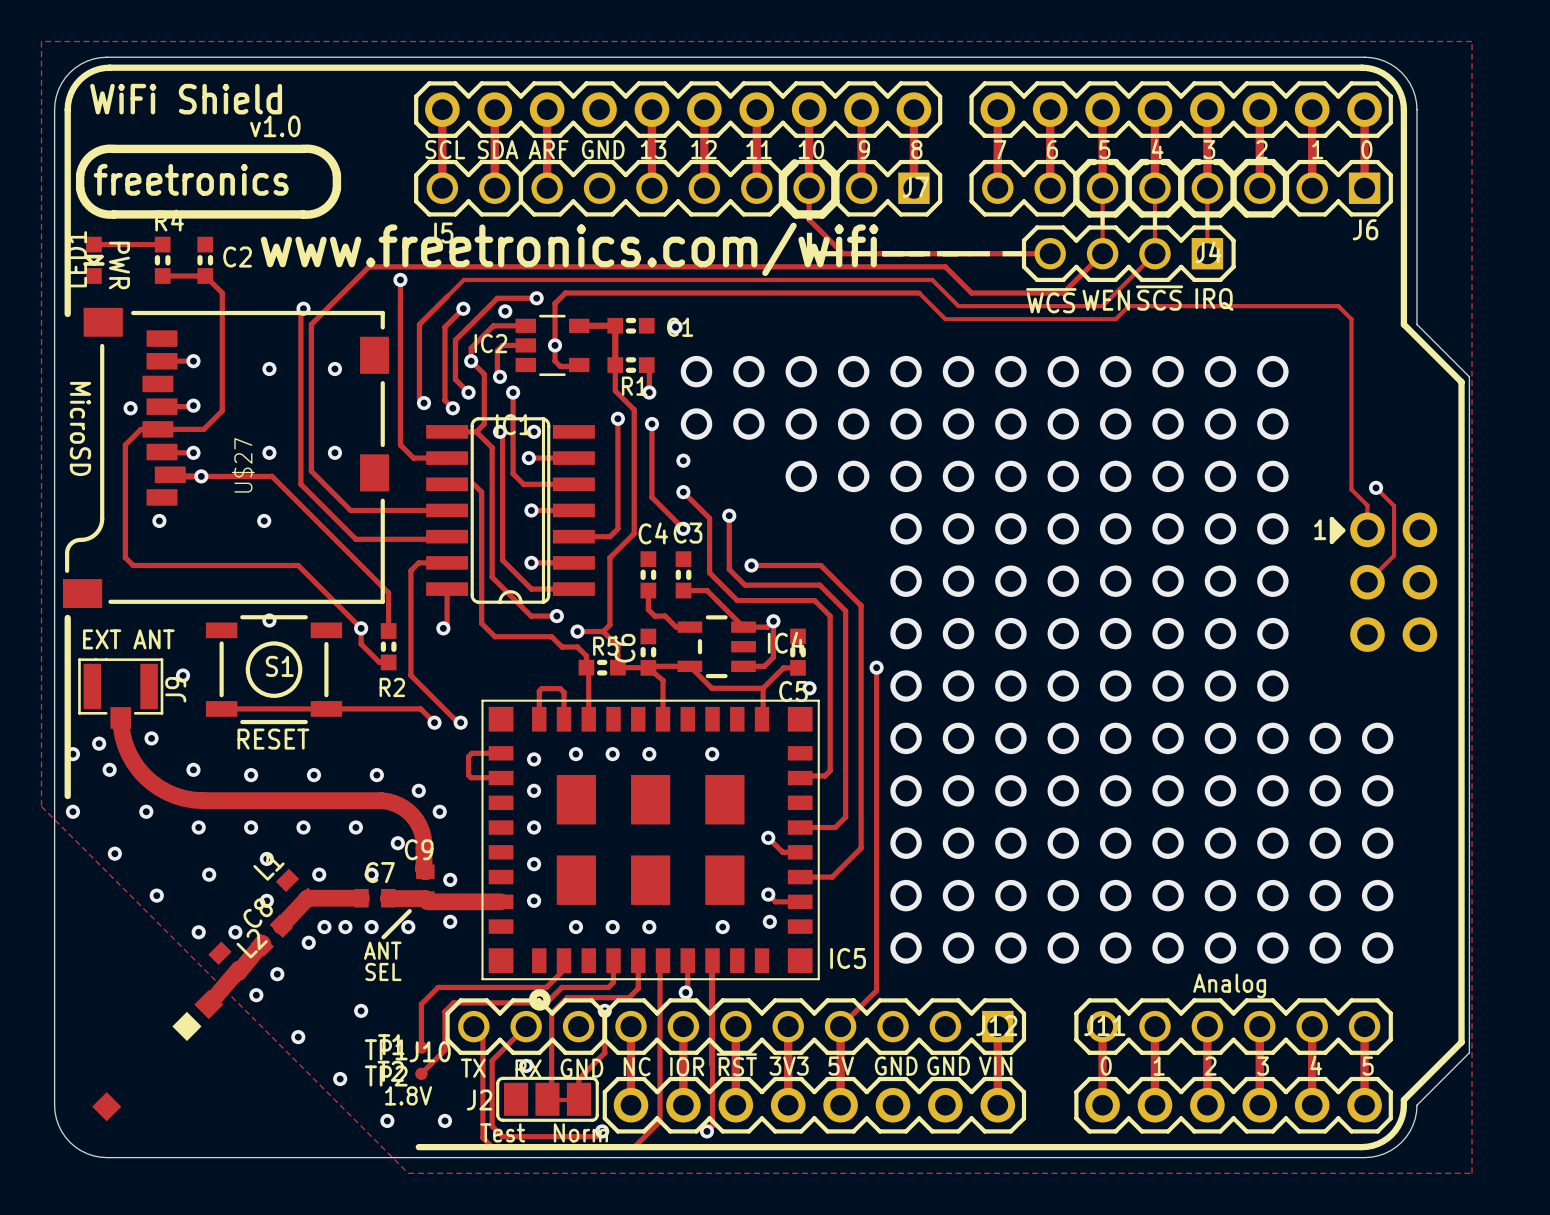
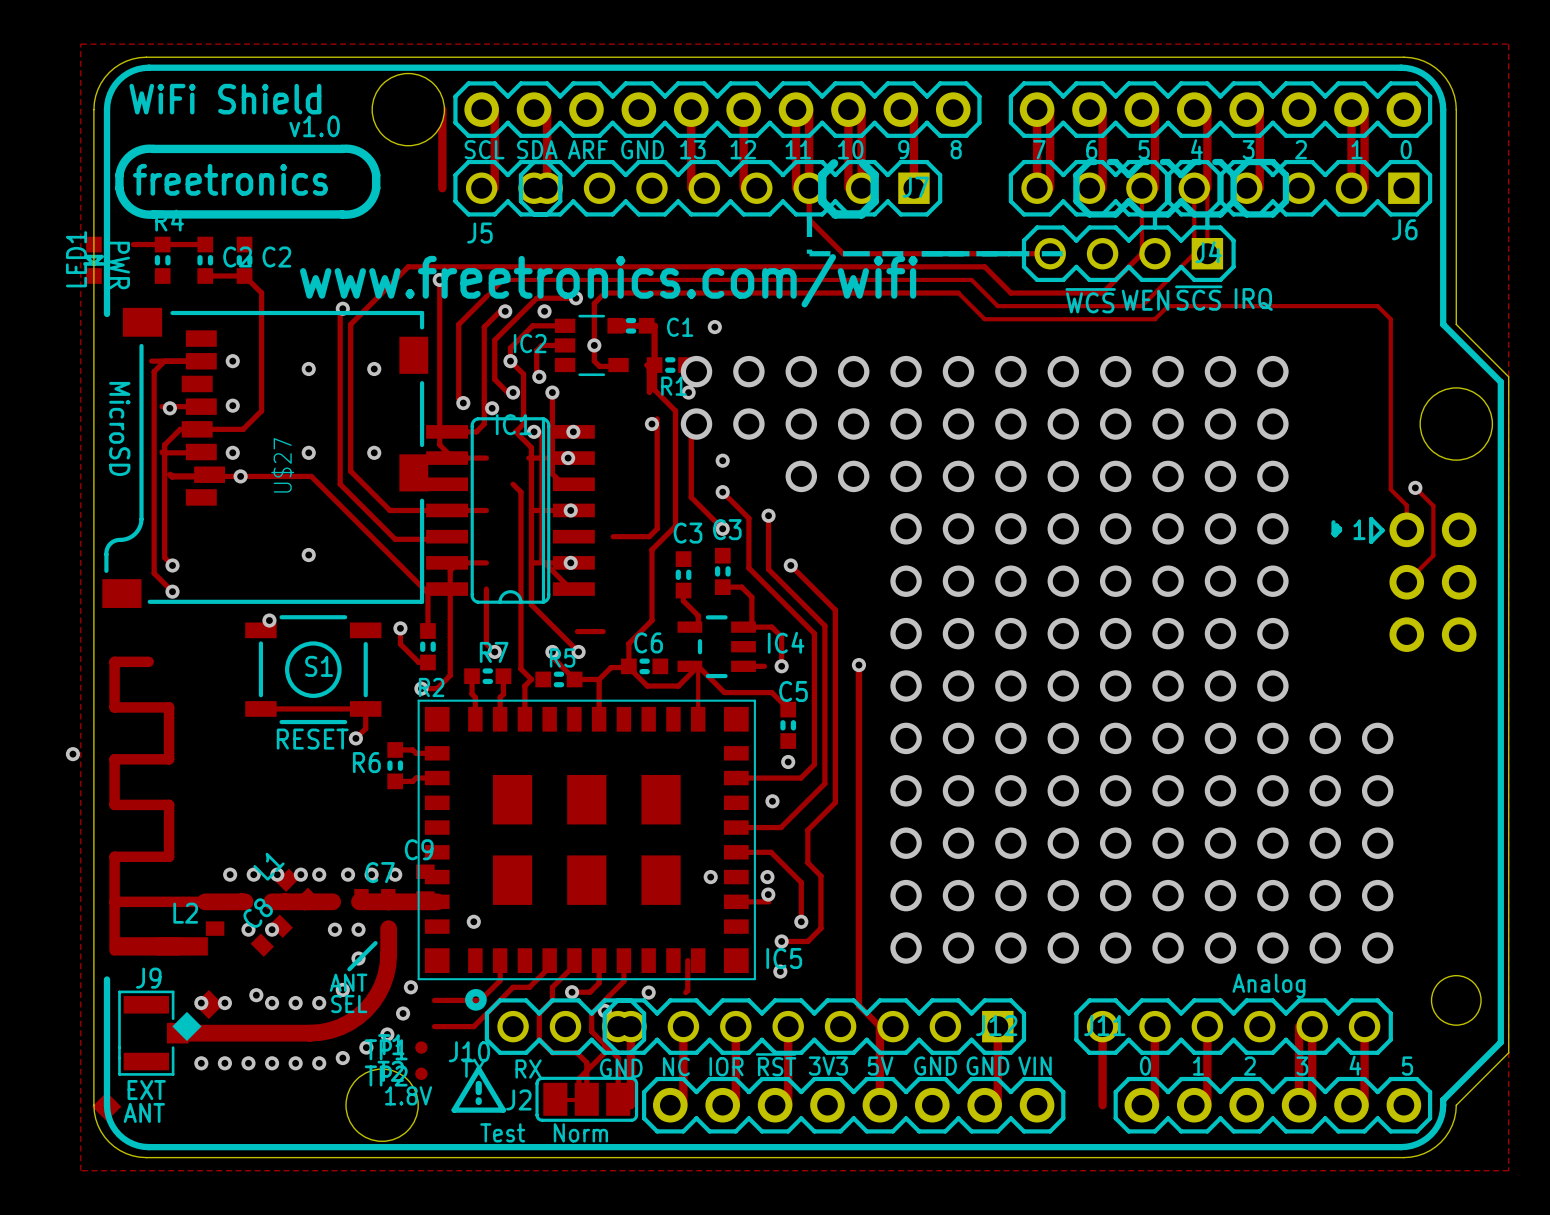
zone outline: (41, 41) (1472, 41) (1472, 1173) (408, 1173) (41, 806) (41, 41) -> (80, 44) (80, 1170) (1508, 1170) (1508, 44) (80, 44)
line: (148, 67) (109, 67) (93, 70) (76, 84) (69, 98) (67, 313) -> (148, 67) (138, 69) (123, 76) (112, 88) (107, 104) (107, 313)
line: (1361, 67) (1372, 69) (1387, 76) (1398, 88) (1403, 104) (1403, 324) (1461, 382) (1461, 1042) (1403, 1099) (1400, 1121) (1391, 1134) (1378, 1143) (1361, 1147) -> (1361, 67) (1412, 69) (1426, 76) (1440, 93) (1443, 109) (1443, 324) (1500, 382) (1500, 1042) (1443, 1099) (1440, 1121) (1426, 1138) (1406, 1146) (1361, 1147)
text position: WiFi Shield (186, 99) -> WiFi Shield (225, 99)
track: (651, 109) (651, 188) -> (691, 109) (691, 188)
track: (704, 109) (704, 188) -> (743, 109) (743, 188)
track: (756, 109) (756, 188) -> (796, 109) (796, 188)
track: none -> (848, 109) (848, 188)
track: (997, 109) (997, 188) -> (1037, 109) (1037, 188)
track: (1312, 109) (1312, 188) -> (1351, 109) (1351, 188)
text position: v1.0 (275, 126) -> v1.0 (314, 126)
line: (153, 148) (110, 148) (98, 151) (86, 160) (80, 175) (82, 195) (88, 205) (95, 210) (110, 214) (153, 214) -> (153, 148) (141, 149) (131, 154) (123, 163) (119, 175) (120, 192) (125, 202) (137, 212) (153, 214)
line: (302, 148) (314, 149) (325, 154) (333, 163) (336, 175) (336, 192) (330, 202) (318, 212) (302, 214) -> (302, 148) (346, 148) (357, 151) (370, 160) (376, 175) (374, 195) (367, 205) (361, 210) (346, 214) (302, 214)
line: (794, 163) (782, 175) (782, 201) (796, 214) (822, 214) (835, 201) (835, 175) (823, 163) -> (834, 163) (822, 175) (822, 201) (835, 214) (861, 214) (874, 201) (874, 175) (862, 163)
line: (1128, 175) (1128, 201) -> (1168, 175) (1168, 201)
line: (1181, 175) (1181, 201) -> (1220, 175) (1220, 201)
text position: freetronics (191, 179) -> freetronics (230, 179)
J5 position: (468, 188) -> (507, 188)
J6 position: (1181, 188) -> (1220, 188)
track: (1102, 191) (1102, 253) (1063, 293) -> (1141, 191) (1141, 253) (1102, 293) (1063, 293)
track: (1154, 191) (1154, 253) (1102, 306) -> (1194, 191) (1194, 253) (1141, 306)
line: (1102, 214) (1102, 224) -> none
track: (93, 244) (133, 244) -> none
text position: www.freetronics.com/wifi (569, 249) -> www.freetronics.com/wifi (608, 280)
line: none -> (1023, 253) (1063, 253)
C2: none -> (244, 260)
track: (408, 266) (369, 266) (311, 324) (311, 471) (350, 510) (389, 510) -> (408, 266) (350, 324) (350, 471) (389, 510)
track: (945, 266) (971, 293) (1010, 293) -> (945, 266) (984, 266) (1010, 293)
track: (162, 275) (201, 275) -> (162, 244) (201, 244)
track: (205, 275) (222, 293) (222, 410) (203, 429) -> (205, 275) (244, 275) (261, 293) (261, 410) (243, 429) (203, 429)
track: (400, 279) (400, 444) (413, 458) (447, 458) -> (439, 279) (439, 444) (452, 458) (486, 458)
via: (400, 279) -> none
via: none -> (439, 279)
track: (503, 279) (463, 279) (419, 324) (419, 398) (424, 403) -> (503, 279) (458, 324) (458, 398) (463, 403)
track: (932, 279) (958, 306) (997, 306) -> (932, 279) (971, 279) (997, 306)
track: (604, 293) (565, 293) (555, 303) (555, 361) (560, 366) (579, 365) -> (604, 293) (594, 303) (594, 361) (599, 366) (618, 365)
track: (919, 293) (945, 319) (984, 319) -> (919, 293) (958, 293) (984, 319)
track: (536, 298) (497, 298) (455, 340) (455, 379) (468, 392) -> (575, 298) (536, 298) (494, 340) (494, 379) (507, 392)
via position: (536, 298) -> (544, 311)
via: none -> (575, 298)
text position: ~{SCS} (1159, 298) -> ~{SCS} (1198, 298)
text position: IRQ (1214, 299) -> IRQ (1253, 299)
text position: ~{WCS} (1051, 300) -> ~{WCS} (1090, 300)
text position: WEN (1106, 300) -> WEN (1145, 300)
track: (1128, 306) (1115, 319) -> (1128, 306) (1102, 306)
track: (1141, 306) (1168, 306) -> (1115, 319) (1154, 319) (1168, 306)
track: (1338, 306) (1351, 319) (1351, 489) (1367, 505) (1367, 529) -> (1338, 306) (1377, 306) (1390, 319) (1390, 489) (1406, 505) (1406, 529)
track: (303, 308) (300, 311) (300, 484) (355, 539) (395, 539) -> (342, 308) (340, 311) (340, 484) (395, 539)
via: (303, 308) -> none
via: none -> (342, 308)
track: (463, 308) (444, 327) (444, 400) (452, 408) -> none
via: (463, 308) -> none
track: (525, 325) (493, 325) (471, 348) (471, 361) (484, 374) -> (502, 308) (484, 327) (484, 374)
track: none -> (565, 325) (532, 325) (510, 348) (510, 361) (523, 374) (523, 424) (515, 431) (531, 447) (531, 604) (578, 651)
track: (579, 325) (615, 325) (615, 390) (634, 409) (634, 533) (609, 557) (609, 624) (603, 631) (617, 646) (617, 667) (648, 667) -> none
track: none -> (618, 325) (654, 325) (654, 389) (675, 410) (675, 526) (651, 549) (651, 620) (628, 643) (628, 667)
via: (675, 327) -> none
via: none -> (714, 327)
track: (525, 345) (502, 345) (497, 350) (497, 374) (500, 376) -> (565, 345) (541, 345) (536, 350) (536, 374) (539, 376)
IC2 position: (552, 345) -> (591, 345)
via: (555, 345) -> none
via: none -> (594, 345)
via: (193, 361) -> none
track: none -> (201, 361) (164, 361) (154, 371) (154, 573) (172, 591)
via: none -> (232, 361)
via: (471, 361) -> none
via: none -> (510, 361)
R1 position: (631, 365) -> (670, 365)
via: (269, 369) -> none
via: none -> (308, 369)
via: (334, 369) -> none
via: none -> (374, 369)
via: (500, 376) -> none
via: none -> (539, 376)
via: (468, 392) -> none
track: (513, 392) (513, 473) (523, 484) (562, 484) -> (552, 392) (552, 473) (562, 484)
via: none -> (552, 392)
via: (649, 392) -> none
via: none -> (688, 392)
via: (424, 403) -> none
via: none -> (463, 403)
via: (193, 405) -> none
via: none -> (232, 405)
via: (130, 408) -> none
via: none -> (169, 408)
via: (452, 408) -> none
via: none -> (492, 408)
track: (617, 418) (617, 528) (610, 536) (573, 536) -> (657, 418) (657, 528) (649, 536) (613, 536)
via: (617, 418) -> none
track: (651, 424) (651, 497) (683, 528) -> (691, 424) (691, 497) (722, 528)
text position: MicroSD (80, 428) -> MicroSD (119, 428)
track: (180, 429) (140, 429) (125, 444) (125, 557) (133, 565) (298, 565) (361, 628) (361, 644) (379, 662) (388, 662) -> (180, 429) (164, 444) (164, 557) (172, 565)
track: (476, 431) (492, 447) (492, 577) (531, 616) (556, 616) -> none
track: (500, 431) (502, 434) (502, 560) (531, 589) (570, 589) -> (539, 431) (541, 434) (541, 560) (570, 589)
via: (500, 431) -> none
via: none -> (573, 431)
via: (193, 452) -> none
via: none -> (232, 452)
via: (269, 452) -> none
via: none -> (308, 452)
via: (334, 452) -> none
via: none -> (374, 452)
U$27 position: (225, 457) -> (265, 457)
via: (528, 458) -> none
via: none -> (568, 458)
via: (683, 460) -> none
via: none -> (722, 460)
via: (201, 476) -> none
via: none -> (240, 476)
track: (272, 476) (388, 593) (388, 631) -> (272, 476) (311, 476) (427, 593) (427, 631)
track: (473, 484) (481, 492) (481, 623) (494, 636) (551, 636) (561, 647) (577, 647) (586, 656) (586, 667) (588, 669) (588, 719) (592, 715) -> none
track: none -> (513, 484) (520, 492) (520, 668) (531, 679) (524, 686) (524, 719)
track: (1376, 487) (1394, 505) (1394, 555) (1367, 582) -> (1415, 487) (1433, 505) (1433, 555) (1406, 582)
via position: (1376, 487) -> (1415, 487)
track: (683, 492) (709, 518) (709, 572) (737, 600) (814, 600) (830, 616) (830, 770) (825, 775) (802, 775) (800, 778) -> none
via: (683, 492) -> none
track: none -> (722, 492) (748, 518) (748, 568) (814, 633) (814, 764) (800, 778) (736, 778)
via: none -> (722, 492)
via: (531, 510) -> none
via: none -> (570, 510)
track: (729, 515) (729, 569) (744, 585) (819, 585) (845, 610) (845, 817) (835, 827) (800, 827) -> none
via position: (729, 515) -> (722, 528)
track: none -> (768, 515) (768, 569) (824, 625) (824, 783) (780, 827) (736, 827)
via: none -> (768, 515)
line: (1331, 518) (1343, 530) (1331, 541) (1331, 518) -> (1371, 518) (1382, 530) (1371, 541) (1371, 518)
via: (159, 520) -> none
via: (264, 520) -> none
via: (683, 528) -> none
text position: 1 (1320, 529) -> 1 (1359, 529)
via: none -> (308, 555)
track: (447, 562) (418, 562) (410, 570) (410, 675) (458, 722) (460, 722) -> none
track: none -> (486, 562) (458, 562) (450, 570) (450, 675) (437, 688) (421, 688)
via: (531, 562) -> none
via: none -> (570, 562)
via: none -> (172, 565)
track: (751, 565) (820, 565) (861, 605) (861, 848) (832, 877) (800, 877) -> none
via: (751, 565) -> none
track: none -> (790, 565) (835, 610) (835, 802) (807, 830) (807, 862) (820, 875) (820, 928) (807, 941) (781, 941)
via: none -> (790, 565)
C3: none -> (722, 571)
C4: (648, 574) -> none
track: none -> (683, 587) (683, 600) (698, 615) (698, 627)
track: (447, 589) (447, 624) (443, 628) -> none
track: none -> (486, 589) (486, 643) (494, 651)
track: (648, 590) (648, 609) (654, 616) (665, 616) (676, 627) (689, 627) -> none
track: (683, 590) (706, 590) (743, 627) (751, 627) -> (722, 587) (741, 587) (751, 597) (751, 627)
via: none -> (172, 591)
part: (762, 607) -> none
part: none -> (801, 607)
via: (556, 616) -> none
line: (67, 617) (67, 796) -> none
via: (773, 621) -> none
track: (767, 627) (773, 621) (773, 657) (764, 666) -> (767, 627) (771, 627) (781, 636) (781, 666)
via: (361, 628) -> none
track: none -> (400, 628) (400, 644) (418, 662) (427, 662)
via: none -> (400, 628)
via: (443, 628) -> none
via: (577, 631) -> none
text: EXT ANT (128, 639) -> none
R2 position: (388, 646) -> (427, 646)
via: none -> (494, 651)
track: none -> (552, 651) (552, 657) (574, 679) (599, 679)
via: none -> (552, 651)
via: none -> (578, 651)
C6 rotation: 0° (648, 652) -> 90° clockwise (644, 666)
C5 position: (798, 652) -> (788, 725)
track: none -> (858, 665) (858, 1005) (879, 1026) (879, 1105)
track: none -> (698, 666) (698, 719)
via: none -> (781, 666)
R5 position: (602, 667) -> (558, 679)
track: none -> (628, 667) (647, 686) (678, 686) (698, 666) (724, 692) (771, 692) (788, 709)
track: none -> (628, 667) (611, 667) (599, 679)
track: (648, 667) (648, 666) (689, 666) (711, 688) (763, 688) -> none
track: (648, 667) (663, 680) (663, 719) -> none
track: (798, 667) (783, 667) (763, 688) -> none
track: (876, 667) (876, 990) (840, 1026) (840, 1105) -> none
via position: (876, 667) -> (858, 665)
S1 position: (274, 669) -> (313, 669)
via: (182, 675) -> none
track: none -> (472, 676) (472, 694) (475, 697) (475, 719)
R7: none -> (487, 676)
track: none -> (503, 676) (503, 694) (500, 697) (500, 719)
track: none -> (599, 679) (599, 719)
via: none -> (421, 688)
track: (763, 688) (762, 719) -> none
via: (809, 688) -> none
J9 rotation: 0° (120, 693) -> 90° counterclockwise (153, 1033)
J9 position: (120, 693) -> (153, 1033)
track: (221, 708) (260, 708) -> (447, 510) (486, 510)
track: (365, 708) (420, 708) (434, 722) -> (365, 708) (365, 728) (355, 738)
track: (120, 717) (122, 736) (133, 761) (144, 776) (167, 792) (185, 798) (203, 800) (381, 800) (393, 802) (408, 811) (419, 825) (423, 842) (425, 871) (424, 866) -> none
track: (539, 719) (539, 691) (541, 688) (560, 688) (563, 692) (563, 719) -> none
via: (434, 722) -> none
via: (460, 722) -> none
via: (151, 738) -> none
via: none -> (355, 738)
text position: RESET (273, 739) -> RESET (312, 739)
via: (99, 743) -> none
track: none -> (395, 749) (412, 749) (416, 753) (437, 753)
track: (501, 753) (472, 753) (468, 756) (468, 775) (471, 777) (501, 778) -> none
via: (575, 754) -> none
via: (612, 754) -> none
via: (649, 754) -> none
via: (712, 754) -> none
via: (534, 759) -> none
via: none -> (788, 762)
R6: none -> (395, 765)
via: (109, 769) -> none
via: (193, 769) -> none
via: (251, 775) -> none
via: (313, 775) -> none
via: (376, 775) -> none
track: none -> (437, 778) (416, 778) (412, 781) (395, 781)
via: (418, 790) -> none
via: (534, 790) -> none
via: none -> (772, 801)
part: none -> (159, 806)
via: (72, 811) -> none
via: (146, 811) -> none
via: (439, 811) -> none
via: (198, 827) -> none
via: (251, 827) -> none
via: (303, 827) -> none
via: (355, 827) -> none
via: (534, 827) -> none
track: (768, 837) (782, 852) (800, 852) -> none
via: (768, 837) -> none
via: (397, 843) -> none
track: none -> (736, 852) (771, 852) (801, 882) (801, 921)
via: (114, 853) -> none
IC5 position: (650, 855) -> (586, 855)
via: (266, 858) -> none
via: (534, 864) -> none
via: (209, 874) -> none
via: none -> (230, 874)
via: none -> (253, 874)
via: none -> (277, 874)
via: none -> (300, 874)
via: none -> (348, 874)
via: none -> (395, 874)
via: none -> (710, 877)
via: none -> (767, 877)
via: (450, 879) -> none
track: (768, 894) (775, 901) (800, 901) -> none
via: (156, 895) -> none
track: (361, 898) (307, 898) (281, 926) -> none
track: (388, 898) (425, 898) (428, 901) -> (359, 901) (428, 901)
via: (266, 900) -> none
via: (534, 900) -> none
track: none -> (205, 901) (245, 901)
track: none -> (271, 901) (332, 901)
track: (437, 901) (501, 901) -> none
track: none -> (736, 901) (768, 901)
line: (409, 911) (383, 937) -> (375, 943) (349, 969)
via position: (450, 921) -> (473, 921)
via: (769, 921) -> none
via: none -> (801, 921)
via: (324, 927) -> none
via: (345, 927) -> none
via: (371, 927) -> none
via: (408, 927) -> none
via: (575, 927) -> none
via: (612, 927) -> none
via: (649, 927) -> none
via: (722, 927) -> none
track: none -> (388, 928) (387, 964) (382, 984) (372, 1002) (349, 1022) (330, 1030) (310, 1033) (177, 1033)
via: none -> (272, 929)
via: none -> (334, 929)
via: none -> (358, 929)
via: (198, 932) -> none
via position: (235, 932) -> (248, 929)
via: none -> (781, 941)
via: (308, 942) -> none
L2 name position: L2 (252, 943) -> L2 (185, 913)
track: (262, 945) (262, 943) (208, 1004) -> none
text position: ANT (382, 950) -> ANT (348, 982)
via: none -> (358, 958)
track: none -> (500, 960) (500, 980) (480, 1000) (434, 1000)
track: none -> (549, 960) (549, 967) (529, 987) (513, 987) (473, 1026) (434, 1026)
track: (563, 960) (563, 969) (546, 987) (438, 987) (421, 1004) (421, 1047) -> none
track: none -> (574, 960) (574, 965) (552, 987) (552, 1000) (539, 1013) (539, 1039) (552, 1052) (576, 1052) (586, 1062) (586, 1099)
track: none -> (599, 960) (599, 983) (590, 992) (572, 992)
track: (613, 960) (613, 982) (608, 987) (561, 987) (546, 1002) (453, 1002) (444, 1011) (444, 1050) (421, 1073) -> none
track: none -> (623, 960) (623, 981) (591, 1013) (591, 1031) (618, 1058) (618, 1099)
track: (638, 960) (638, 988) (629, 997) (567, 997) (551, 1013) (551, 1095) (547, 1099) -> none
track: (663, 960) (659, 963) (659, 1121) (634, 1147) (492, 1147) (482, 1137) (482, 1035) (473, 1026) -> none
L2 rotation: 0° (229, 962) -> 45° clockwise (215, 915)
L2 position: (229, 962) -> (215, 915)
via: none -> (780, 971)
text position: SEL (383, 972) -> SEL (349, 1004)
via: (277, 974) -> none
line: none -> (107, 979) (107, 1110) (112, 1126) (127, 1141) (148, 1147) (418, 1147)
text position: Analog (1229, 985) -> Analog (1268, 985)
via: none -> (410, 987)
via: none -> (342, 989)
via: none -> (572, 992)
via: none -> (648, 992)
via: (685, 992) -> none
via: none -> (201, 1003)
via: none -> (224, 1003)
via: none -> (272, 1003)
via: none -> (295, 1003)
via: none -> (319, 1003)
via: (361, 1010) -> none
via: none -> (403, 1013)
track: (526, 1026) (492, 1060) (492, 1126) (502, 1136) (596, 1136) (602, 1131) -> none
J10 position: (526, 1026) -> (565, 1026)
track: (1259, 1026) (1259, 1105) -> (1299, 1026) (1299, 1105)
via: none -> (387, 1034)
via: (298, 1037) -> none
via: none -> (366, 1047)
via: none -> (342, 1058)
via: none -> (201, 1063)
via: none -> (224, 1063)
via: none -> (248, 1063)
via: none -> (272, 1063)
via: none -> (295, 1063)
via: none -> (319, 1063)
track: (711, 1064) (712, 960) (712, 1125) (706, 1131) -> none
via: (526, 1065) -> none
text position: GND (581, 1068) -> GND (621, 1068)
line: none -> (478, 1069) (454, 1110) (503, 1110) (478, 1069)
via: (340, 1079) -> none
line: none -> (478, 1083) (478, 1092)
text: none -> EXT (146, 1090)
J2 position: (547, 1099) -> (586, 1099)
line: none -> (478, 1100) (478, 1101)
text: none -> ANT (144, 1112)
via: (387, 1120) -> none
via: (444, 1120) -> none
via: (602, 1131) -> none
via: (706, 1131) -> none

